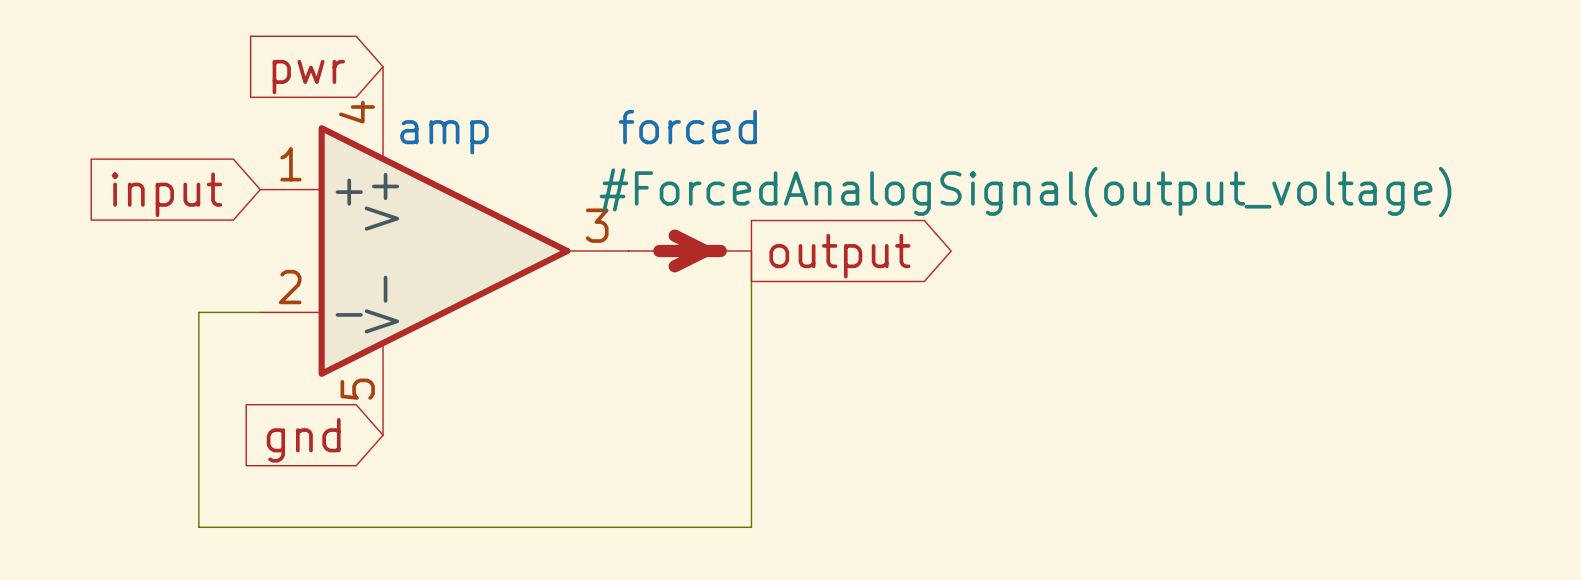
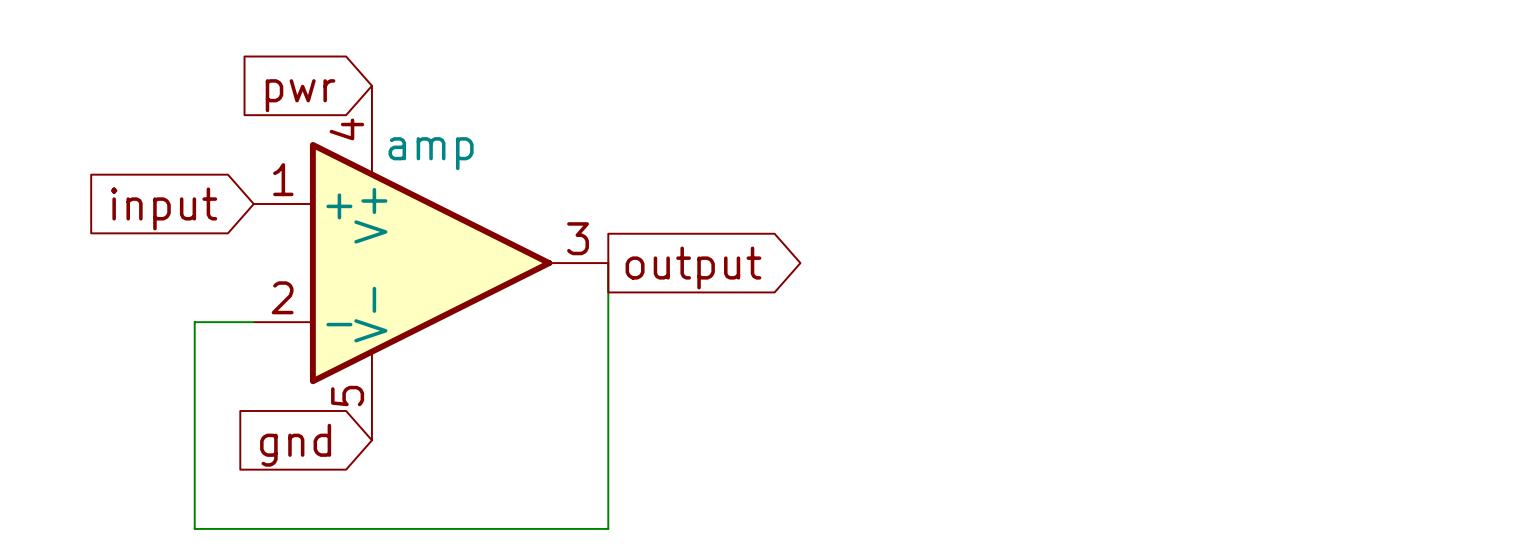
forced: #ForcedAnalogSignal(output_voltage) (690, 250) -> none
wire: (751, 250) (751, 527) (628, 527) -> (608, 263) (608, 528)
global label position: output (839, 256) -> output (693, 268)

